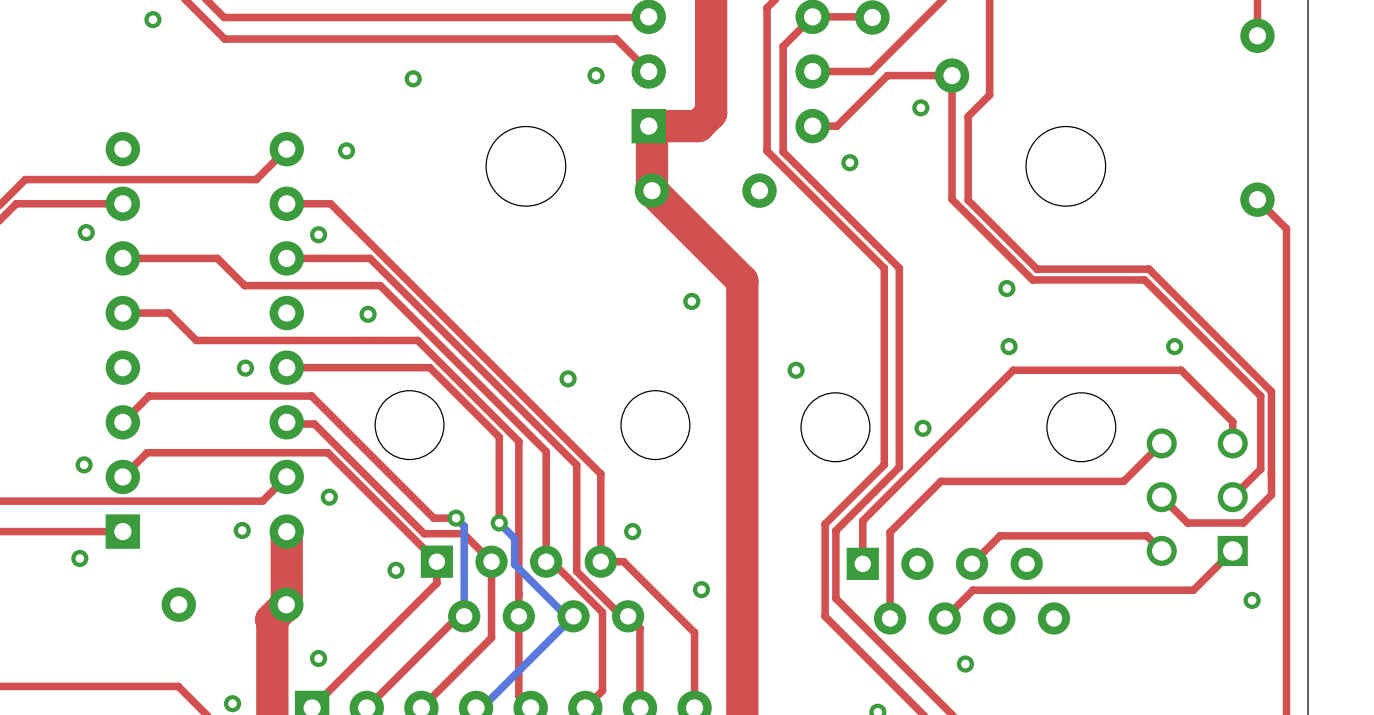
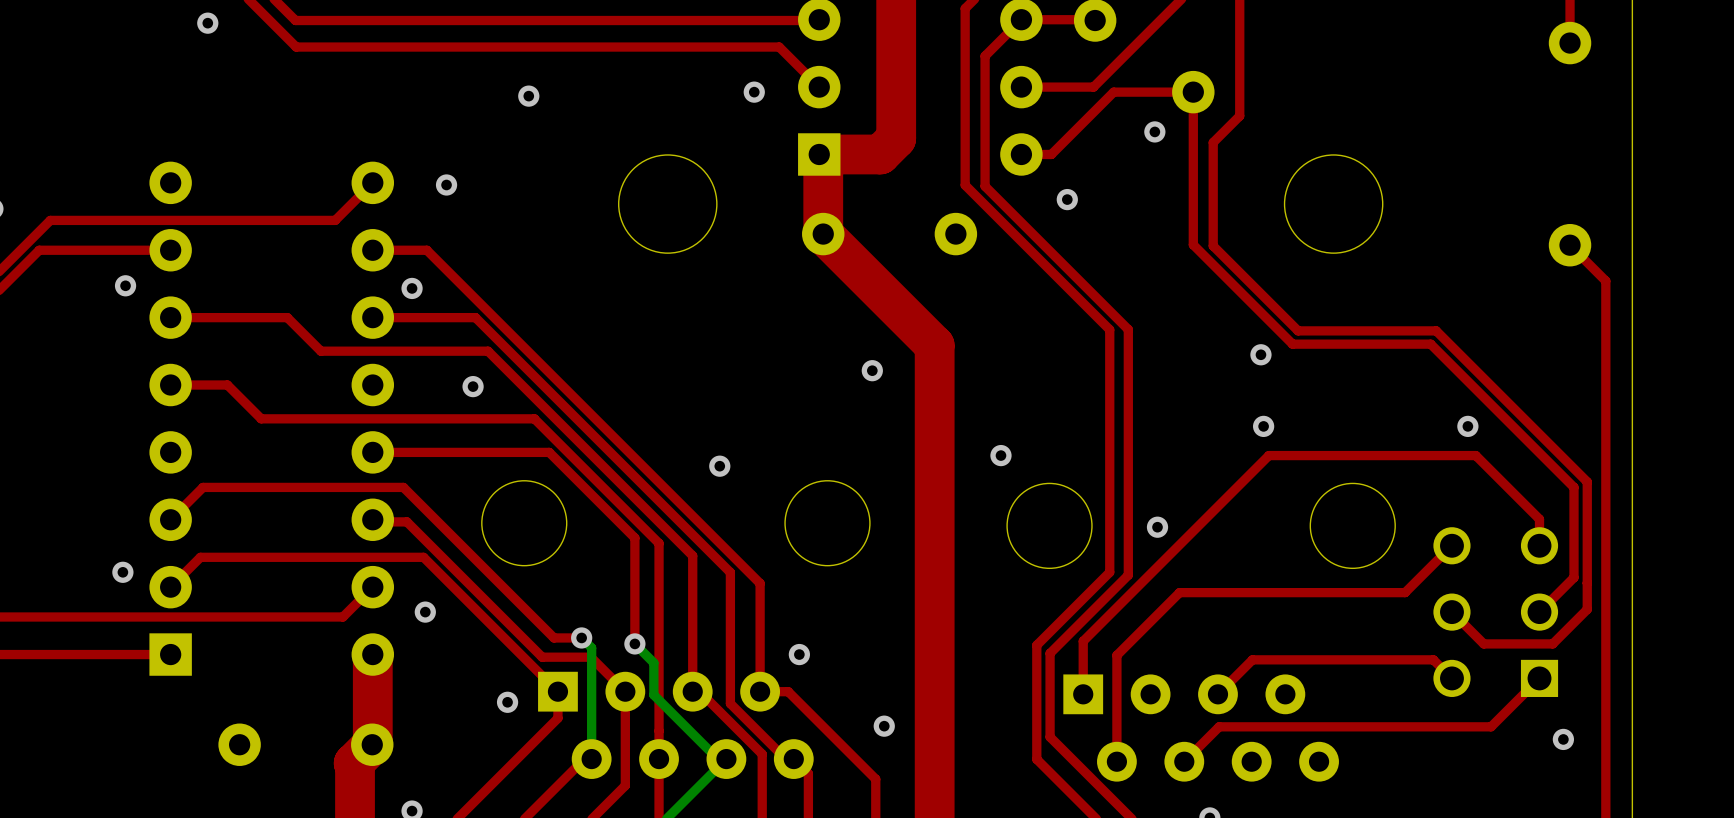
via: (245, 368) -> none
via: (242, 530) -> none
via: (79, 558) -> none

